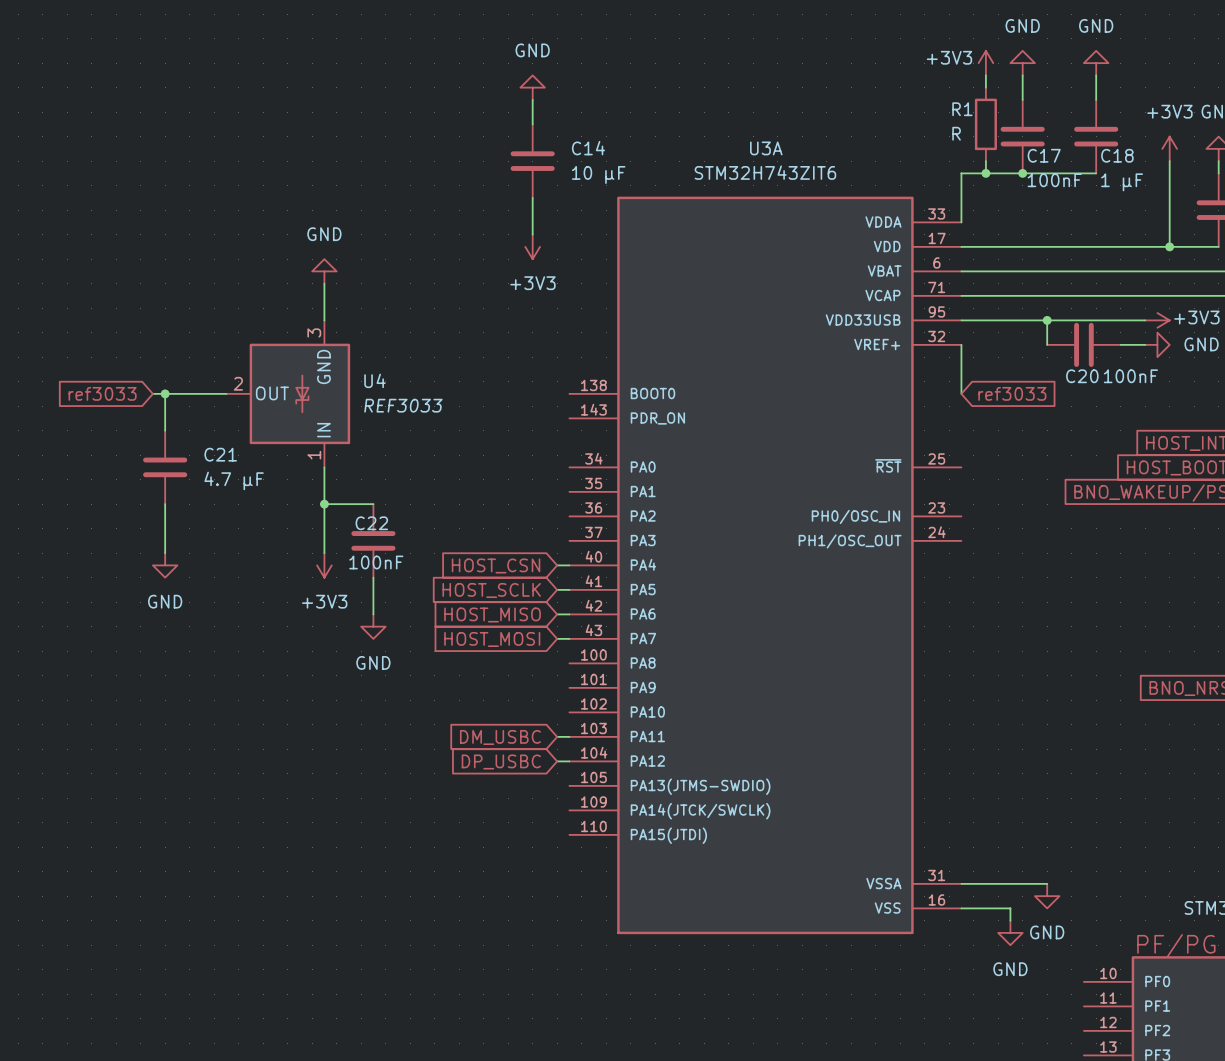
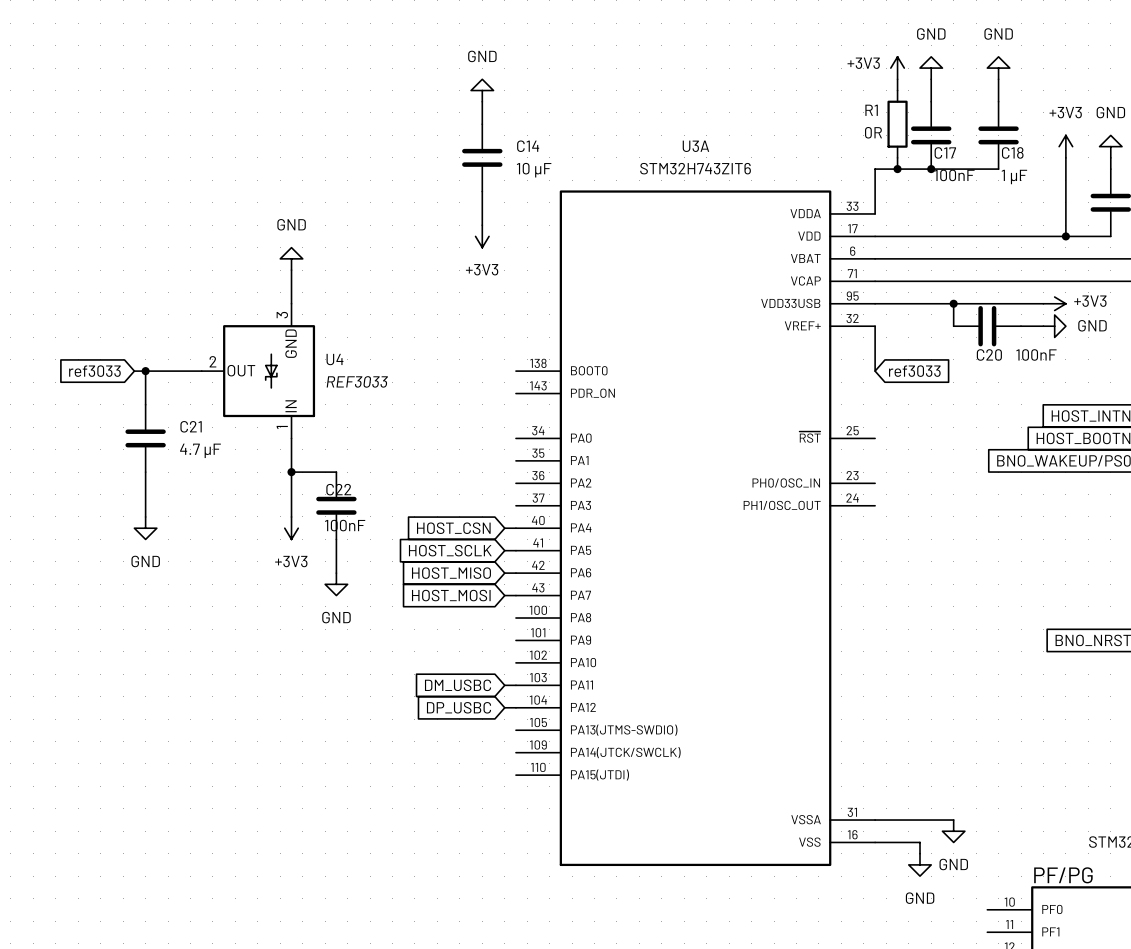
R1 value: R (956, 133) -> 0R (873, 132)

